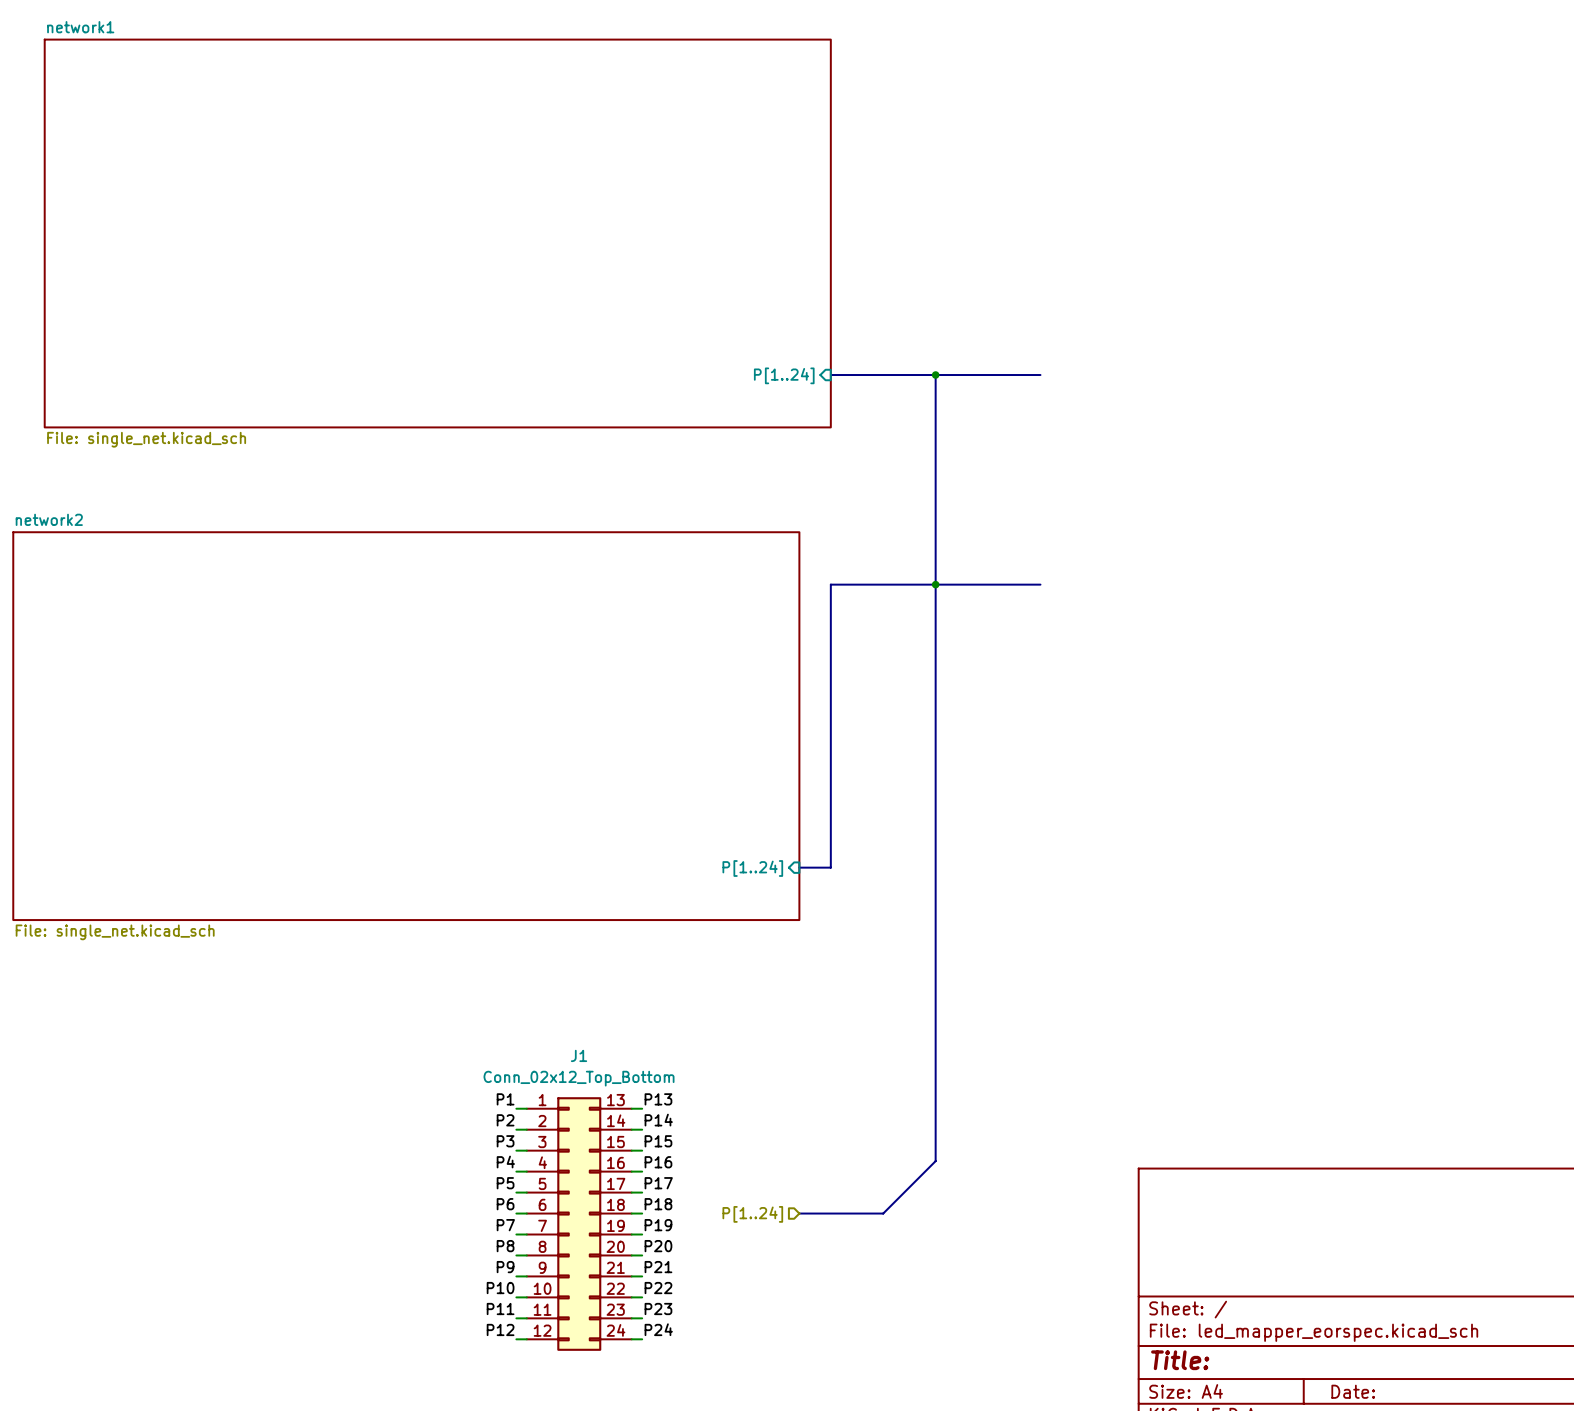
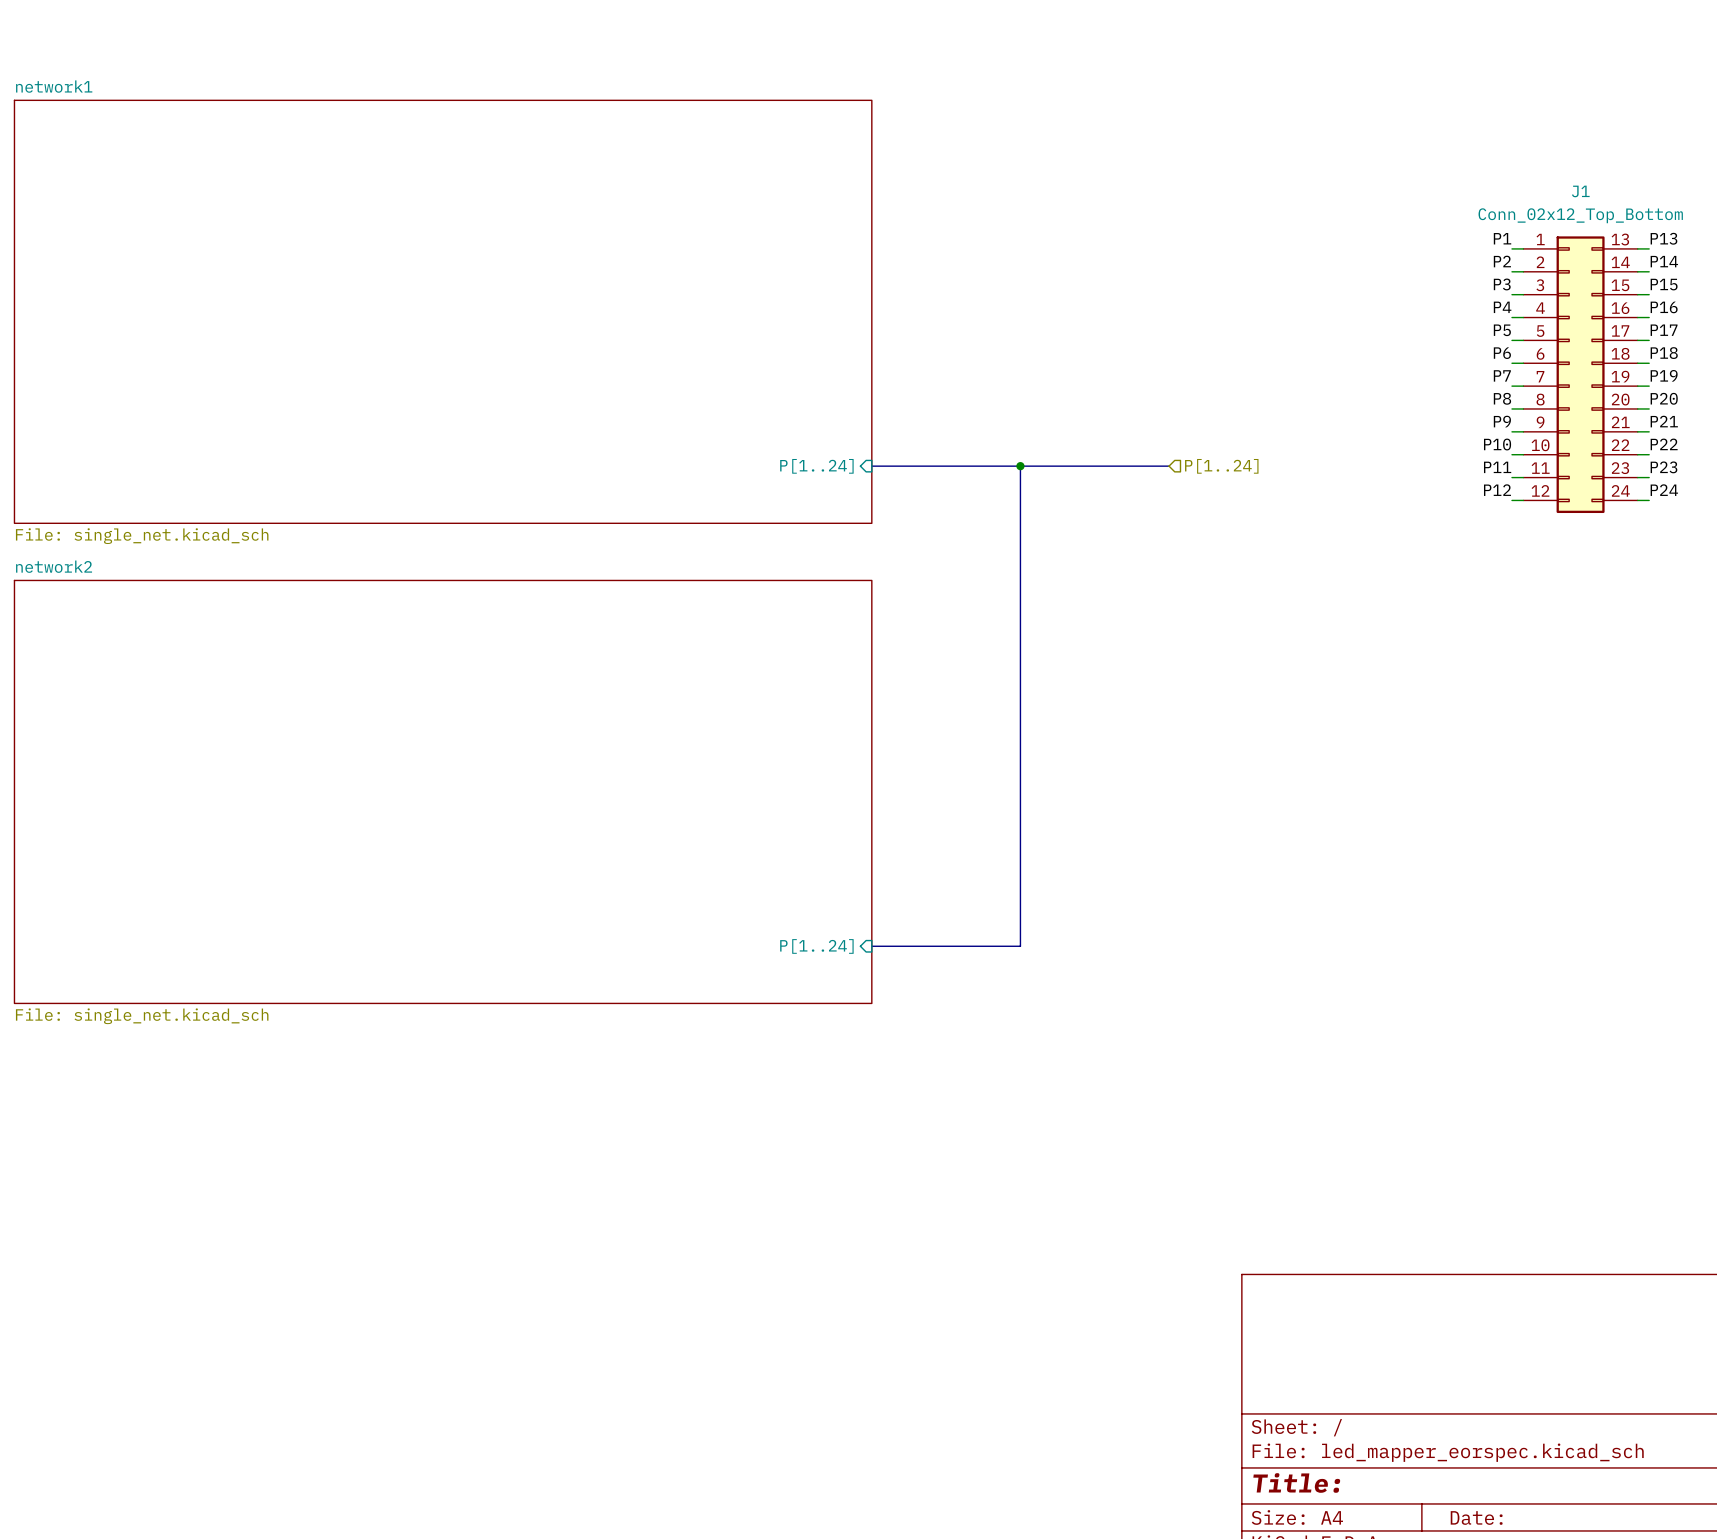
label: none -> P1 (1502, 238)
label: none -> P13 (1663, 238)
wire: none -> (1511, 248) (1523, 248)
wire: none -> (1637, 248) (1649, 248)
sheet network1 position: (437, 233) -> (443, 311)
label: none -> P2 (1502, 261)
label: none -> P14 (1664, 261)
wire: none -> (1511, 271) (1523, 271)
wire: none -> (1637, 271) (1649, 271)
label: none -> P3 (1502, 284)
label: none -> P15 (1664, 284)
wire: none -> (1511, 294) (1523, 294)
wire: none -> (1637, 294) (1649, 294)
label: none -> P4 (1502, 307)
label: none -> P16 (1664, 307)
wire: none -> (1511, 317) (1523, 317)
wire: none -> (1637, 317) (1649, 317)
label: none -> P5 (1502, 330)
label: none -> P17 (1664, 330)
wire: none -> (1511, 340) (1523, 340)
wire: none -> (1637, 340) (1649, 340)
label: none -> P6 (1502, 353)
label: none -> P18 (1664, 353)
wire: none -> (1511, 363) (1523, 363)
wire: none -> (1637, 363) (1649, 363)
label: none -> P7 (1502, 375)
label: none -> P19 (1664, 375)
wire: none -> (1511, 386) (1523, 386)
wire: none -> (1637, 386) (1649, 386)
label: none -> P8 (1502, 398)
label: none -> P20 (1664, 398)
sheet pin position: P[1..24] (784, 375) -> P[1..24] (816, 466)
bus: (830, 375) (1040, 375) -> none
bus: (935, 375) (935, 427) -> none
junction: (935, 375) -> none
wire: none -> (1511, 408) (1523, 408)
wire: none -> (1637, 408) (1649, 408)
label: none -> P9 (1502, 421)
label: none -> P21 (1664, 421)
wire: none -> (1511, 431) (1523, 431)
wire: none -> (1637, 431) (1649, 431)
label: none -> P10 (1497, 444)
label: none -> P22 (1664, 444)
wire: none -> (1511, 454) (1523, 454)
wire: none -> (1637, 454) (1649, 454)
bus: none -> (871, 466) (1169, 466)
junction: none -> (1020, 466)
hierarchical label: none -> P[1..24] (1221, 466)
label: none -> P11 (1497, 467)
label: none -> P23 (1663, 467)
wire: none -> (1511, 477) (1523, 477)
wire: none -> (1637, 477) (1649, 477)
label: none -> P12 (1497, 490)
label: none -> P24 (1664, 490)
wire: none -> (1511, 500) (1523, 500)
wire: none -> (1637, 500) (1649, 500)
junction: (935, 584) -> none
bus: (1040, 584) (830, 584) (830, 867) -> (1020, 946) (906, 946)
bus: (935, 867) (935, 1161) (883, 1213) (799, 1213) -> none
label: P1 (505, 1099) -> none
label: P13 (658, 1099) -> none
wire: (516, 1108) (526, 1108) -> none
wire: (631, 1108) (642, 1108) -> none
label: P2 (505, 1120) -> none
label: P14 (658, 1120) -> none
wire: (516, 1129) (526, 1129) -> none
wire: (631, 1129) (642, 1129) -> none
label: P3 (505, 1141) -> none
label: P15 (658, 1141) -> none
wire: (516, 1150) (526, 1150) -> none
wire: (631, 1150) (642, 1150) -> none
label: P4 (505, 1162) -> none
label: P16 (658, 1162) -> none
wire: (516, 1171) (526, 1171) -> none
wire: (631, 1171) (642, 1171) -> none
label: P5 (505, 1183) -> none
label: P17 (658, 1183) -> none
wire: (516, 1192) (526, 1192) -> none
wire: (631, 1192) (642, 1192) -> none
label: P6 (505, 1204) -> none
label: P18 (658, 1204) -> none
wire: (516, 1213) (526, 1213) -> none
wire: (631, 1213) (642, 1213) -> none
hierarchical label: P[1..24] (752, 1214) -> none
J1 position: (579, 1224) -> (1580, 374)
label: P7 (505, 1225) -> none
label: P19 (658, 1225) -> none
wire: (516, 1234) (526, 1234) -> none
wire: (631, 1234) (642, 1234) -> none
label: P8 (505, 1246) -> none
label: P20 (658, 1246) -> none
wire: (516, 1255) (526, 1255) -> none
wire: (631, 1255) (642, 1255) -> none
label: P9 (505, 1267) -> none
label: P21 (658, 1267) -> none
wire: (516, 1276) (526, 1276) -> none
wire: (631, 1276) (642, 1276) -> none
label: P10 (500, 1288) -> none
label: P22 (658, 1288) -> none
wire: (516, 1297) (526, 1297) -> none
wire: (631, 1297) (642, 1297) -> none
label: P11 (500, 1309) -> none
label: P23 (658, 1309) -> none
wire: (516, 1318) (526, 1318) -> none
wire: (631, 1318) (642, 1318) -> none
label: P12 (500, 1329) -> none
label: P24 (658, 1329) -> none
wire: (516, 1339) (526, 1339) -> none
wire: (631, 1339) (642, 1339) -> none

